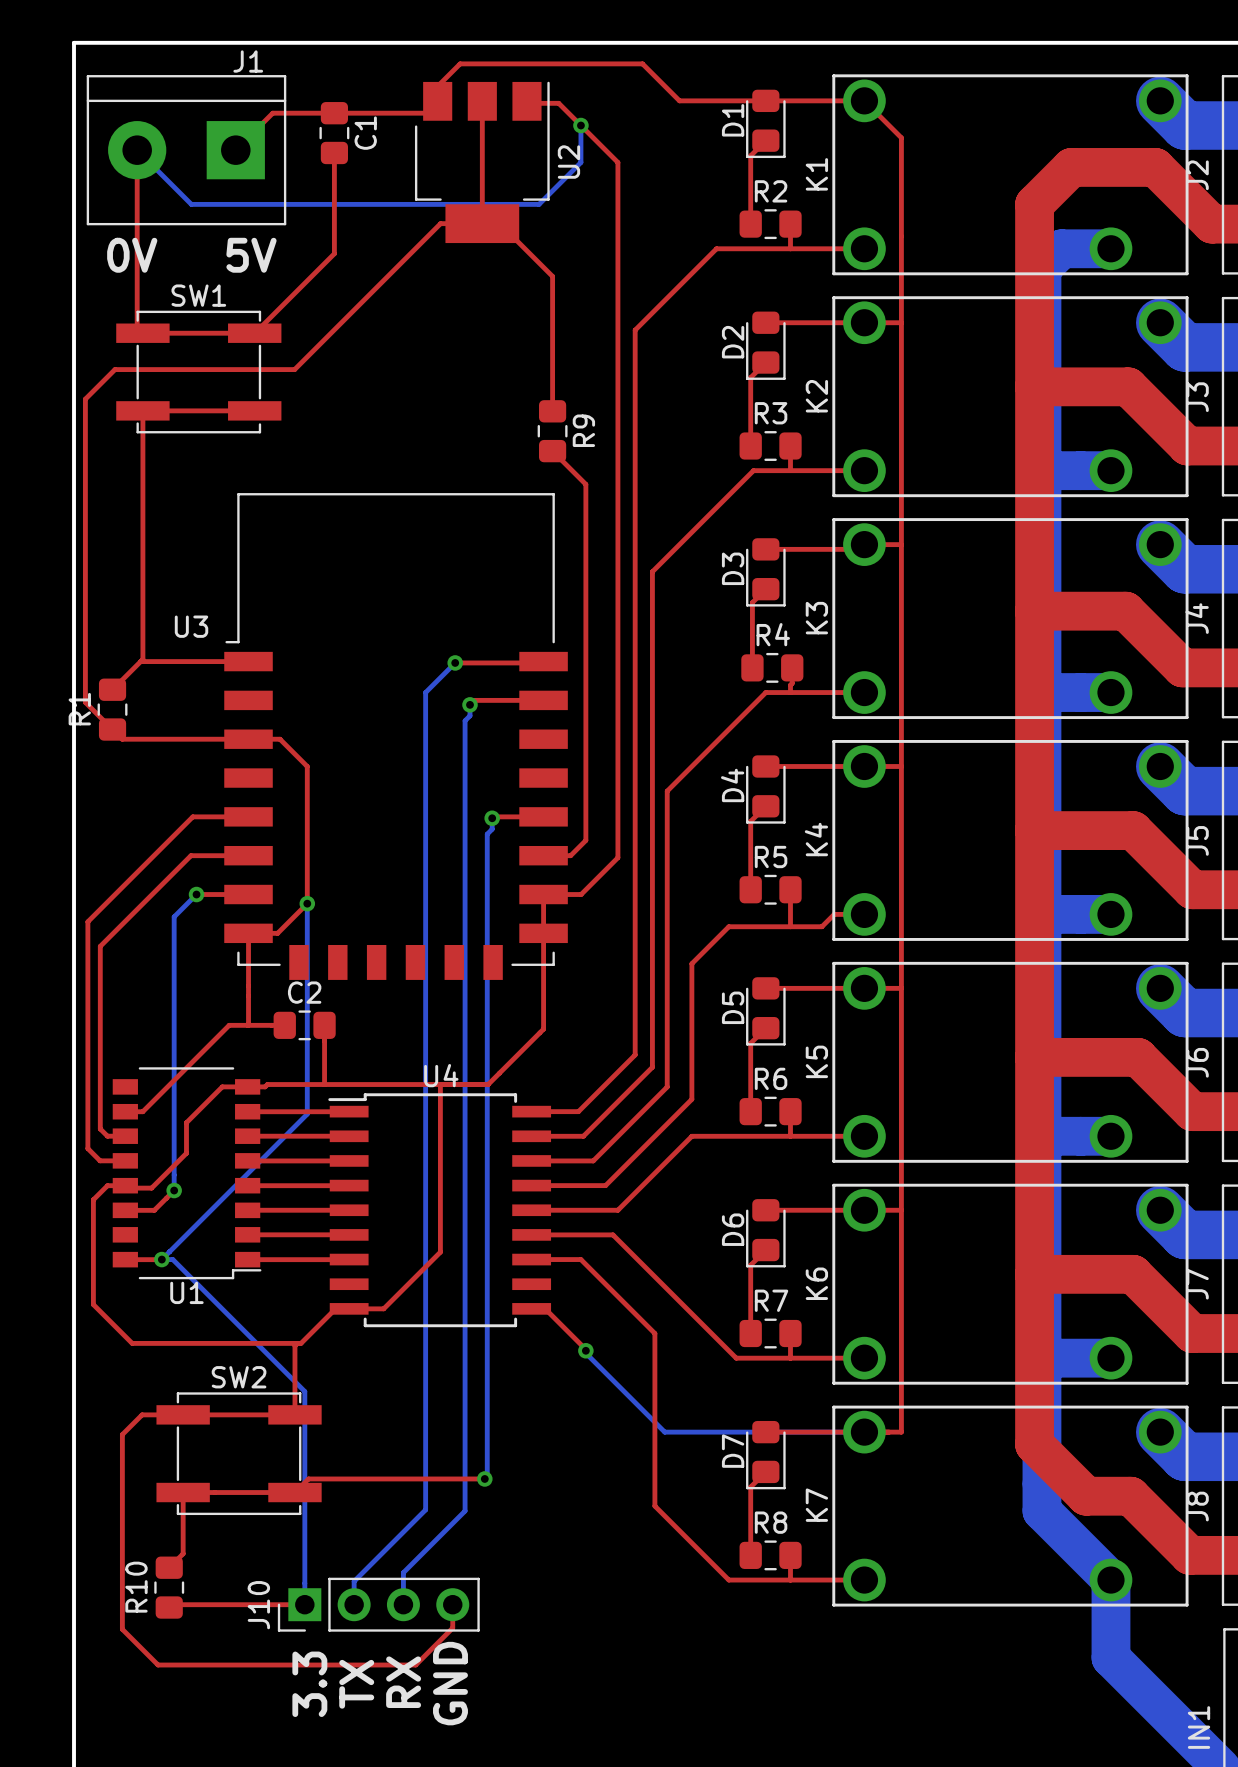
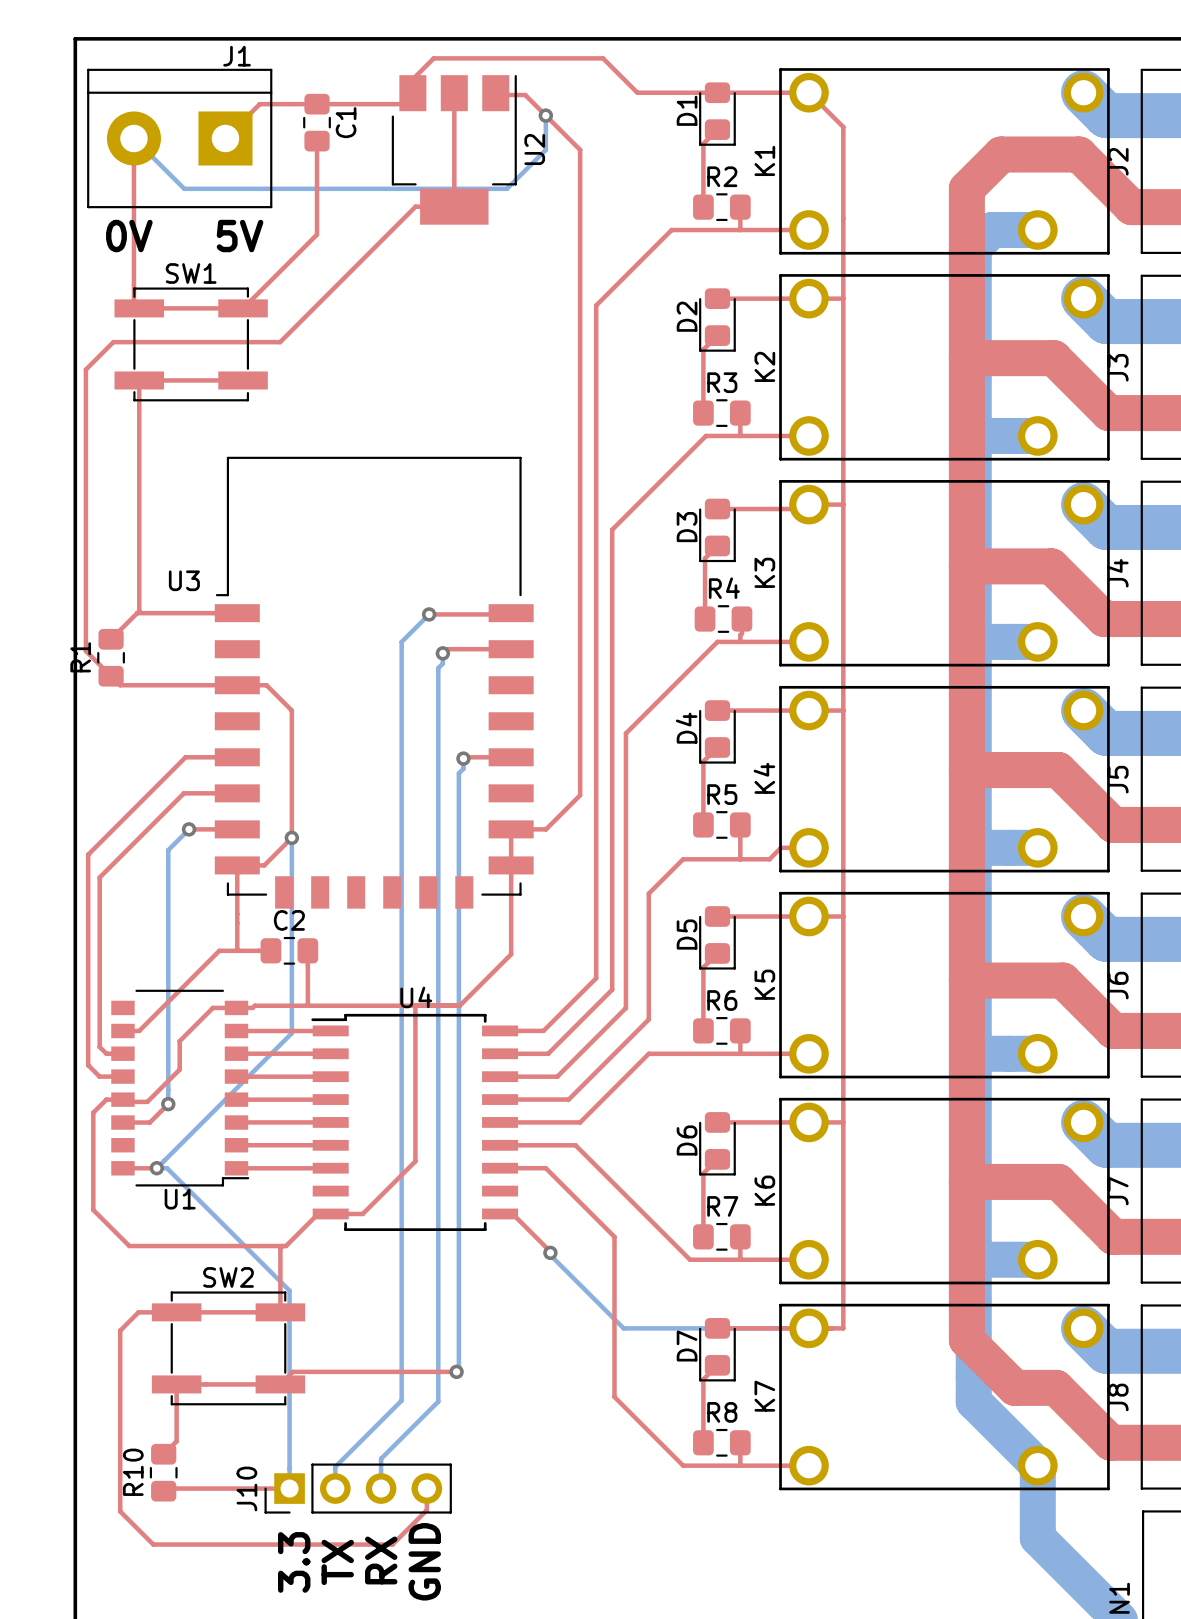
top track: (482, 223) (499, 223) (552, 276) (552, 411) -> none
R9: (552, 431) -> none
top track: (552, 451) (585, 484) (585, 840) (570, 855) (543, 855) -> none

